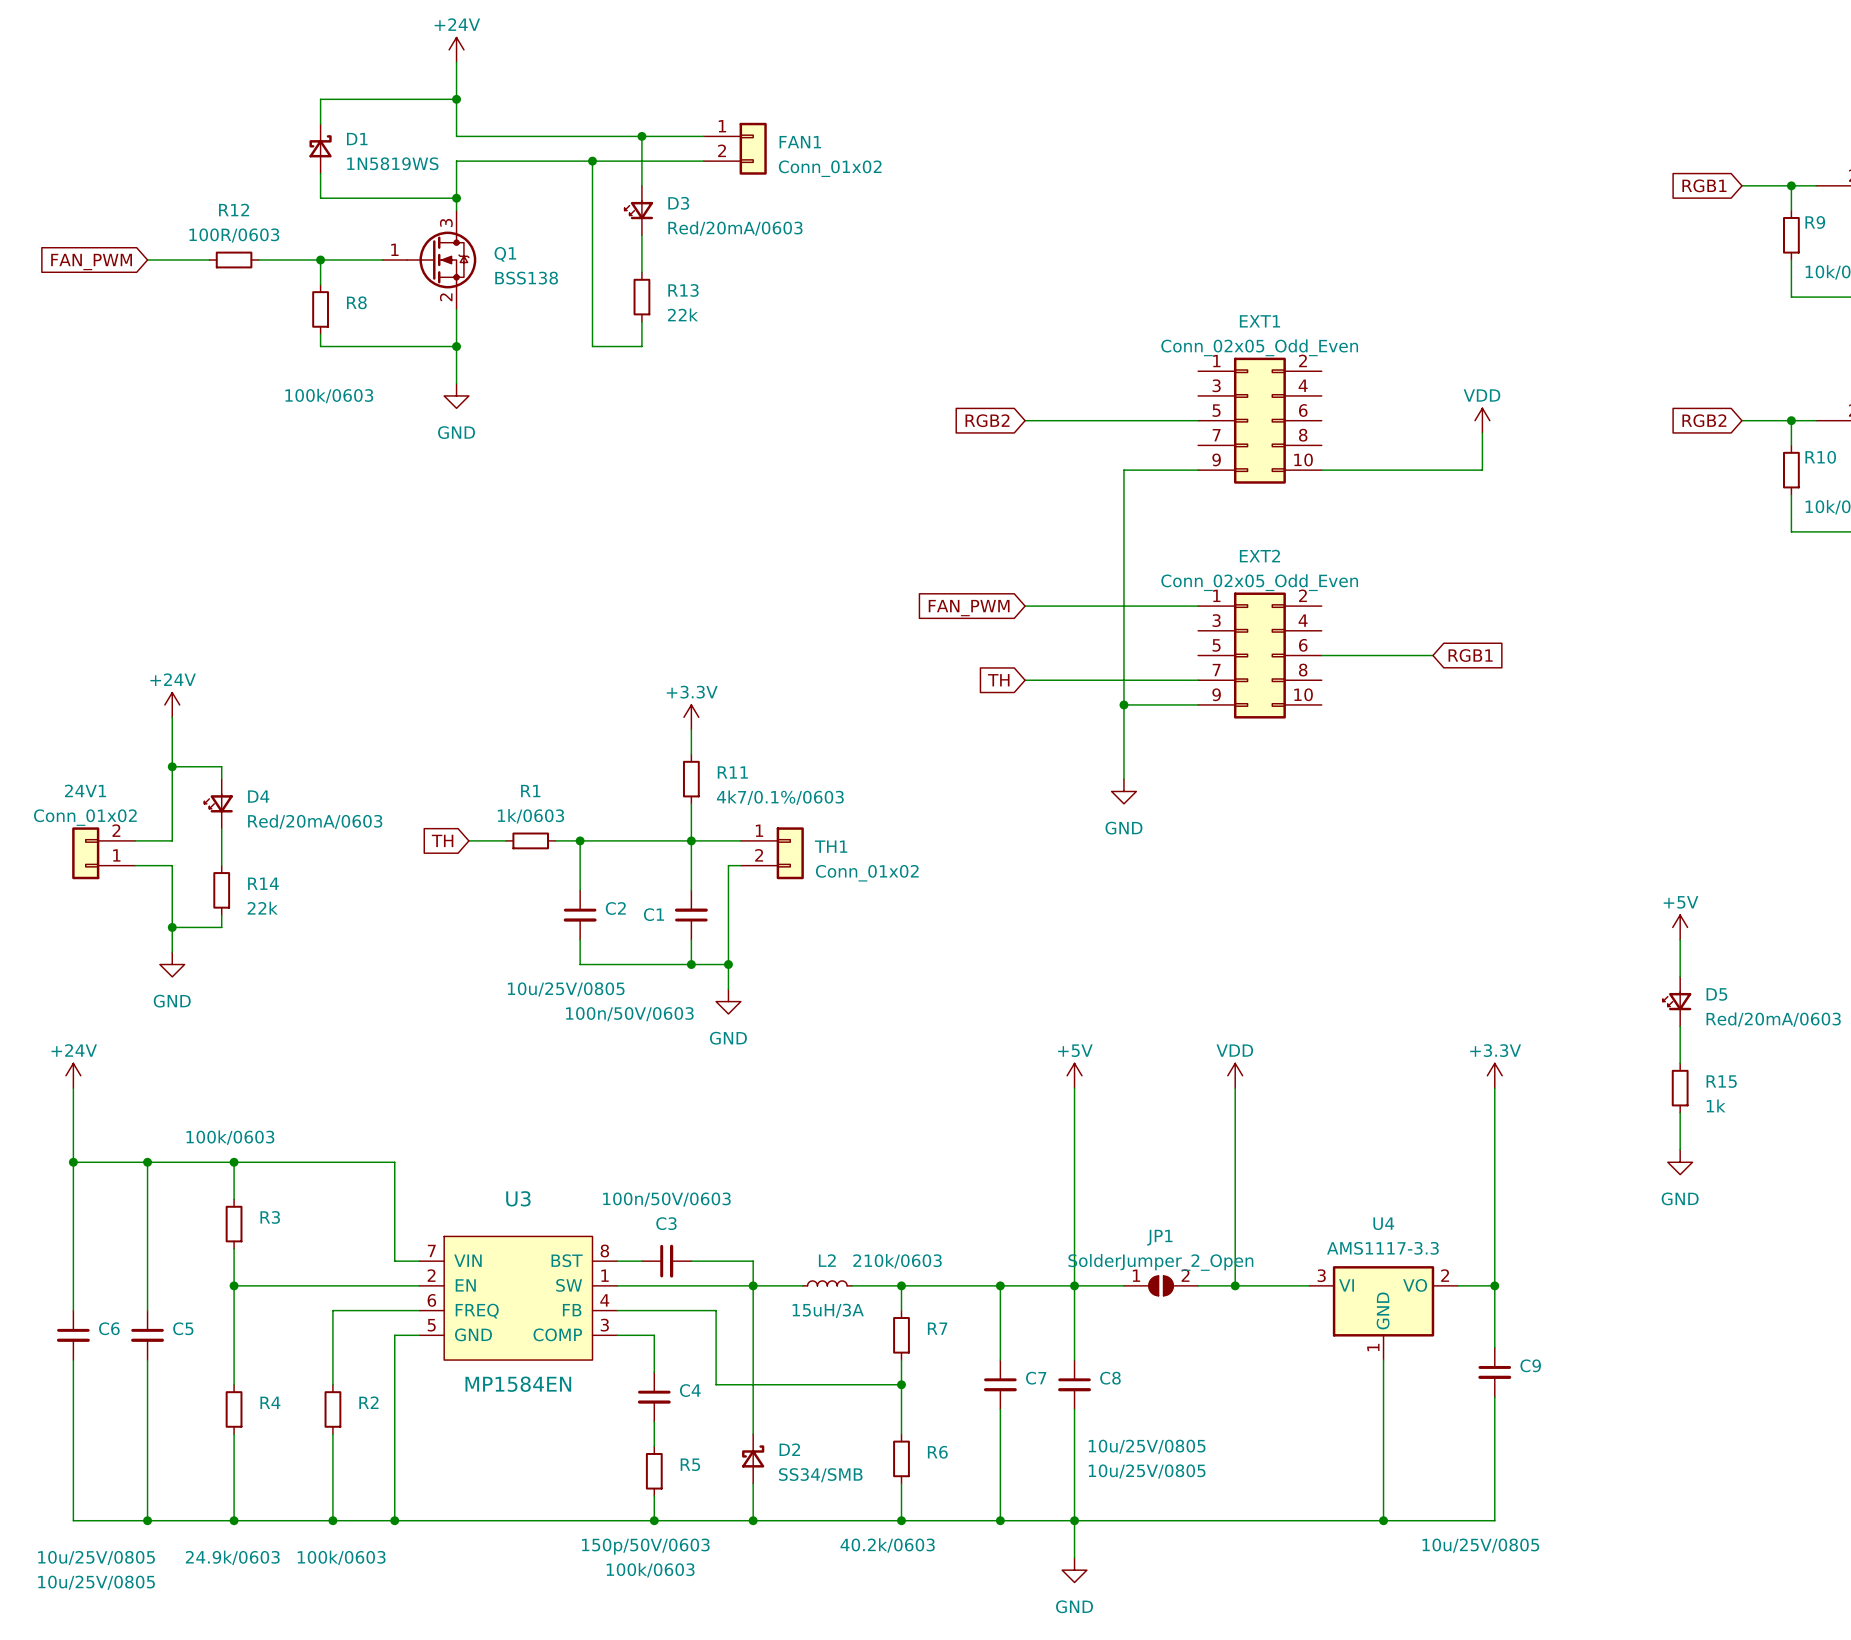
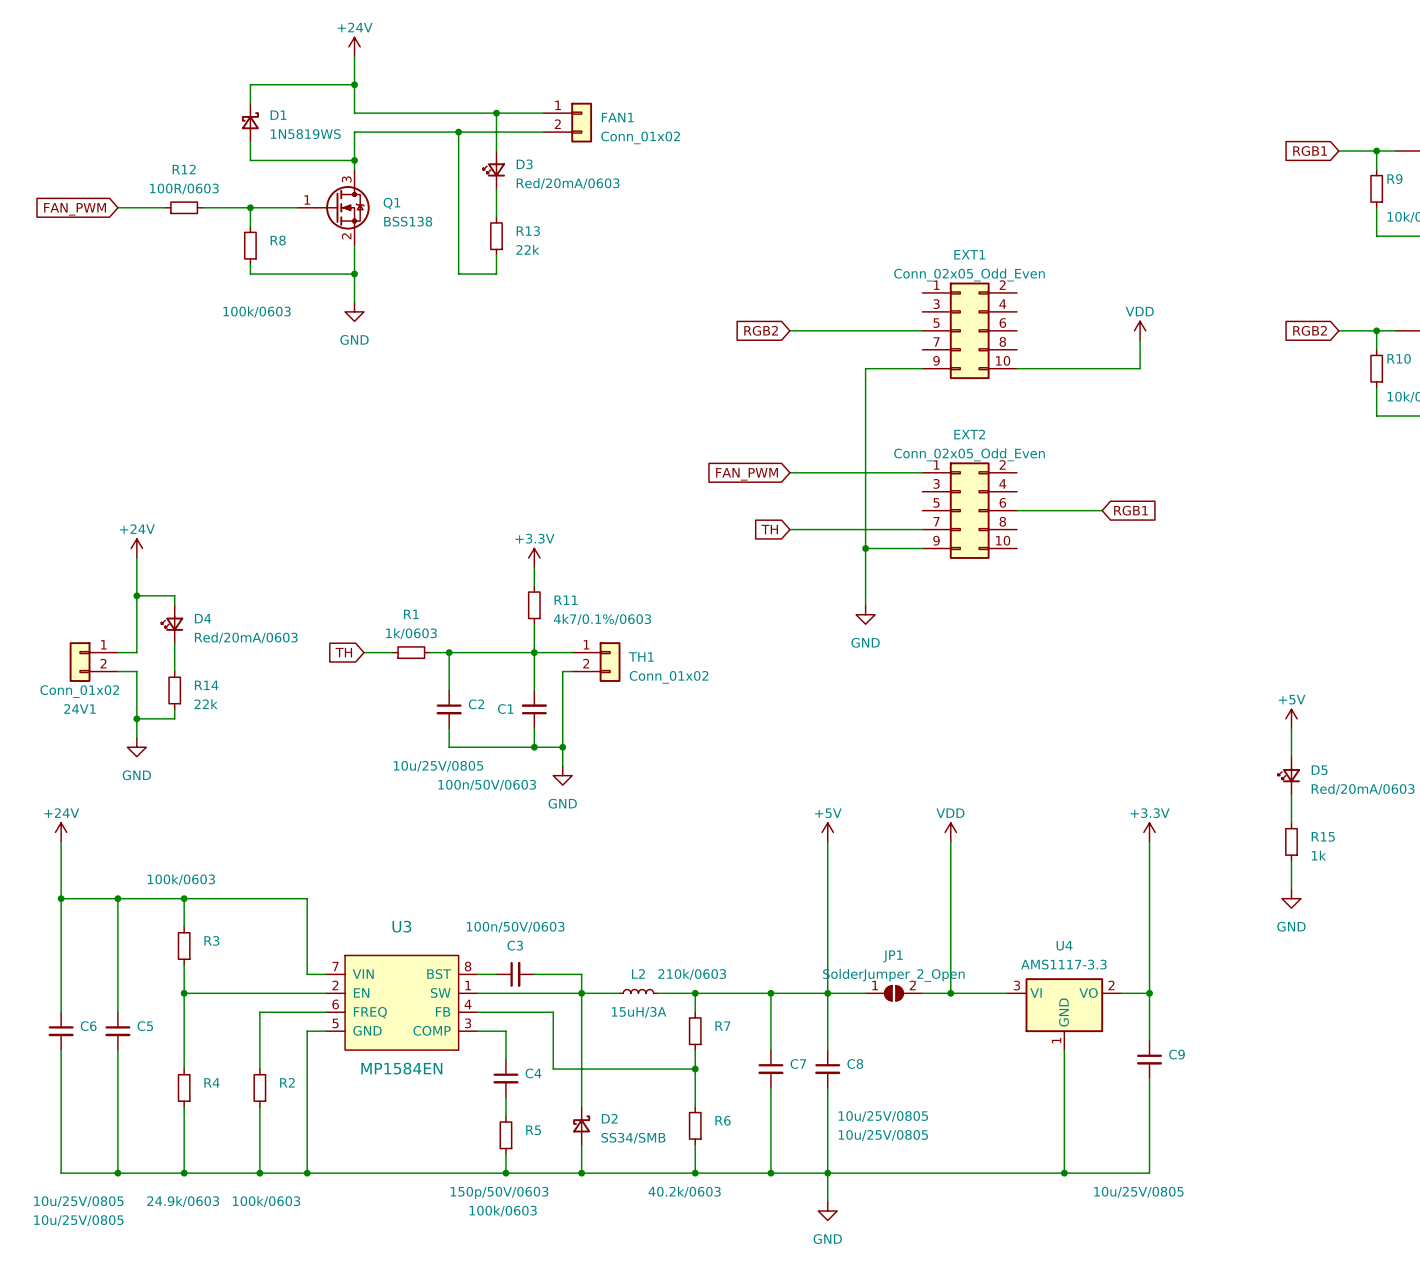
24V1 flip: as is (85, 853) -> up-down (80, 662)

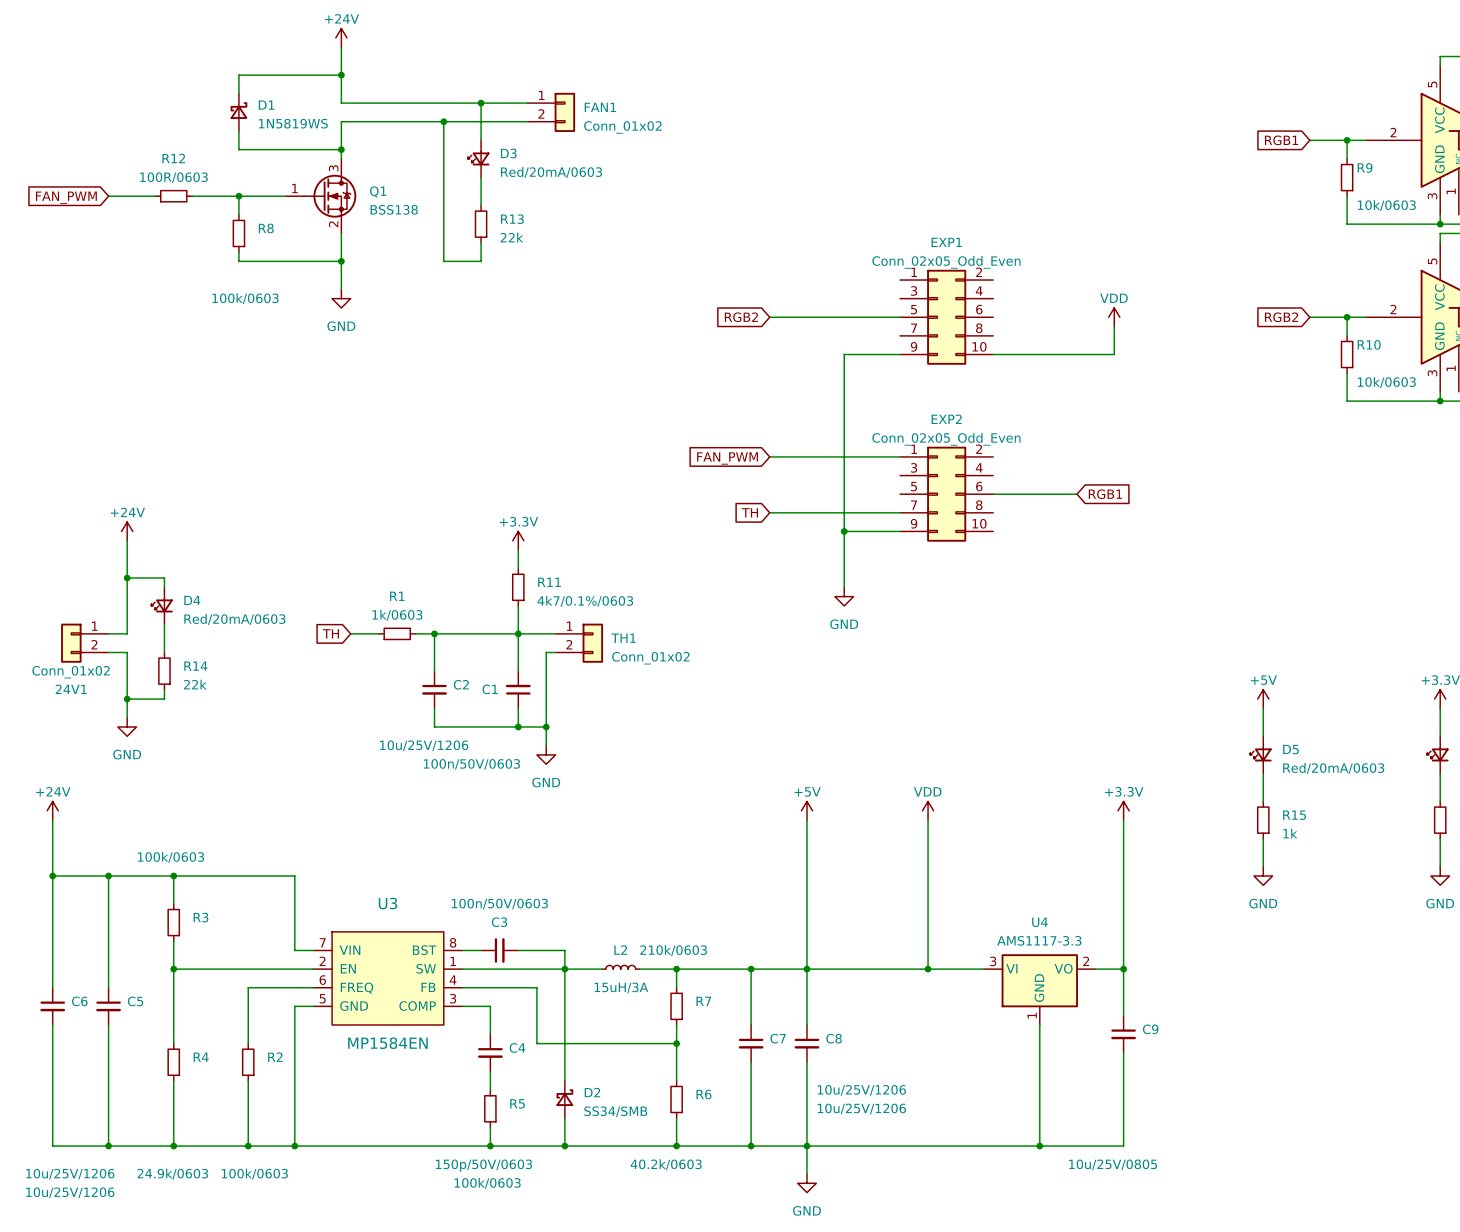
EXT1 name: EXT1 (969, 254) -> EXP1 (946, 242)
EXT2 name: EXT2 (969, 434) -> EXP2 (946, 419)
C2 value: 10u/25V/0805 (438, 766) -> 10u/25V/1206 (424, 745)
JP1: SolderJumper_2_Open (893, 993) -> none
C8 value: 10u/25V/0805 (883, 1116) -> 10u/25V/1206 (861, 1090)
C7 value: 10u/25V/0805 (883, 1135) -> 10u/25V/1206 (861, 1108)
C5 value: 10u/25V/0805 (78, 1201) -> 10u/25V/1206 (70, 1174)
C6 value: 10u/25V/0805 (78, 1220) -> 10u/25V/1206 (70, 1192)

